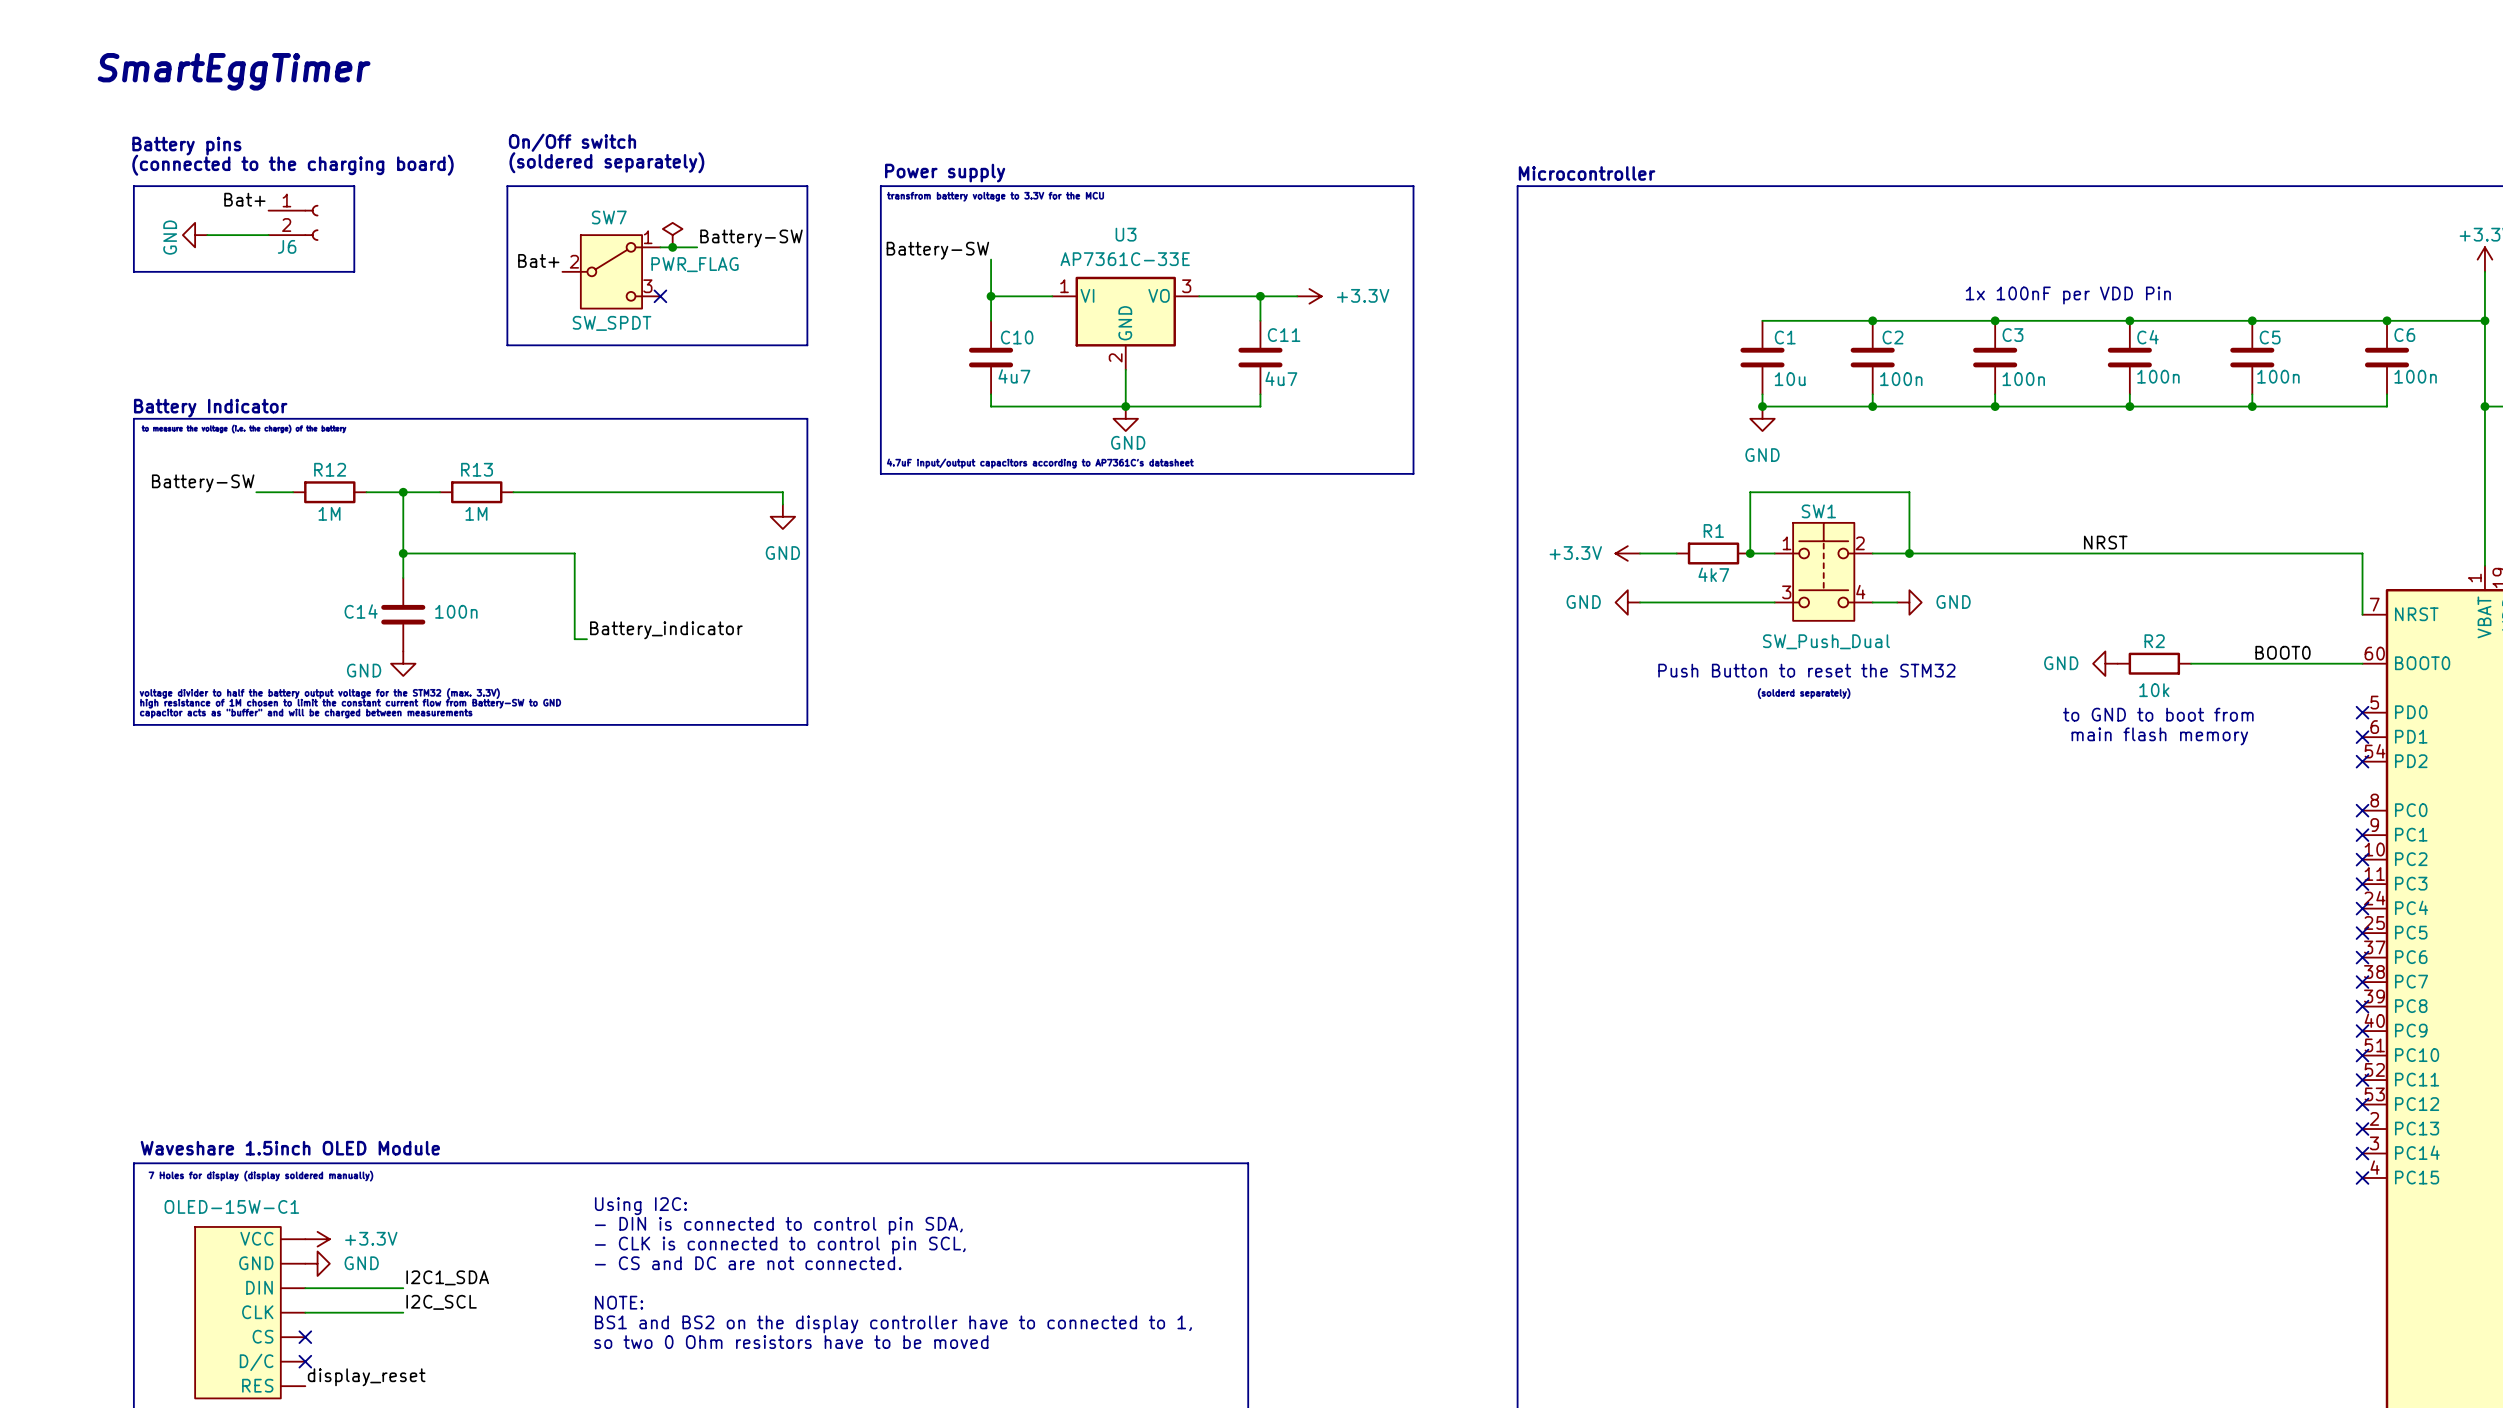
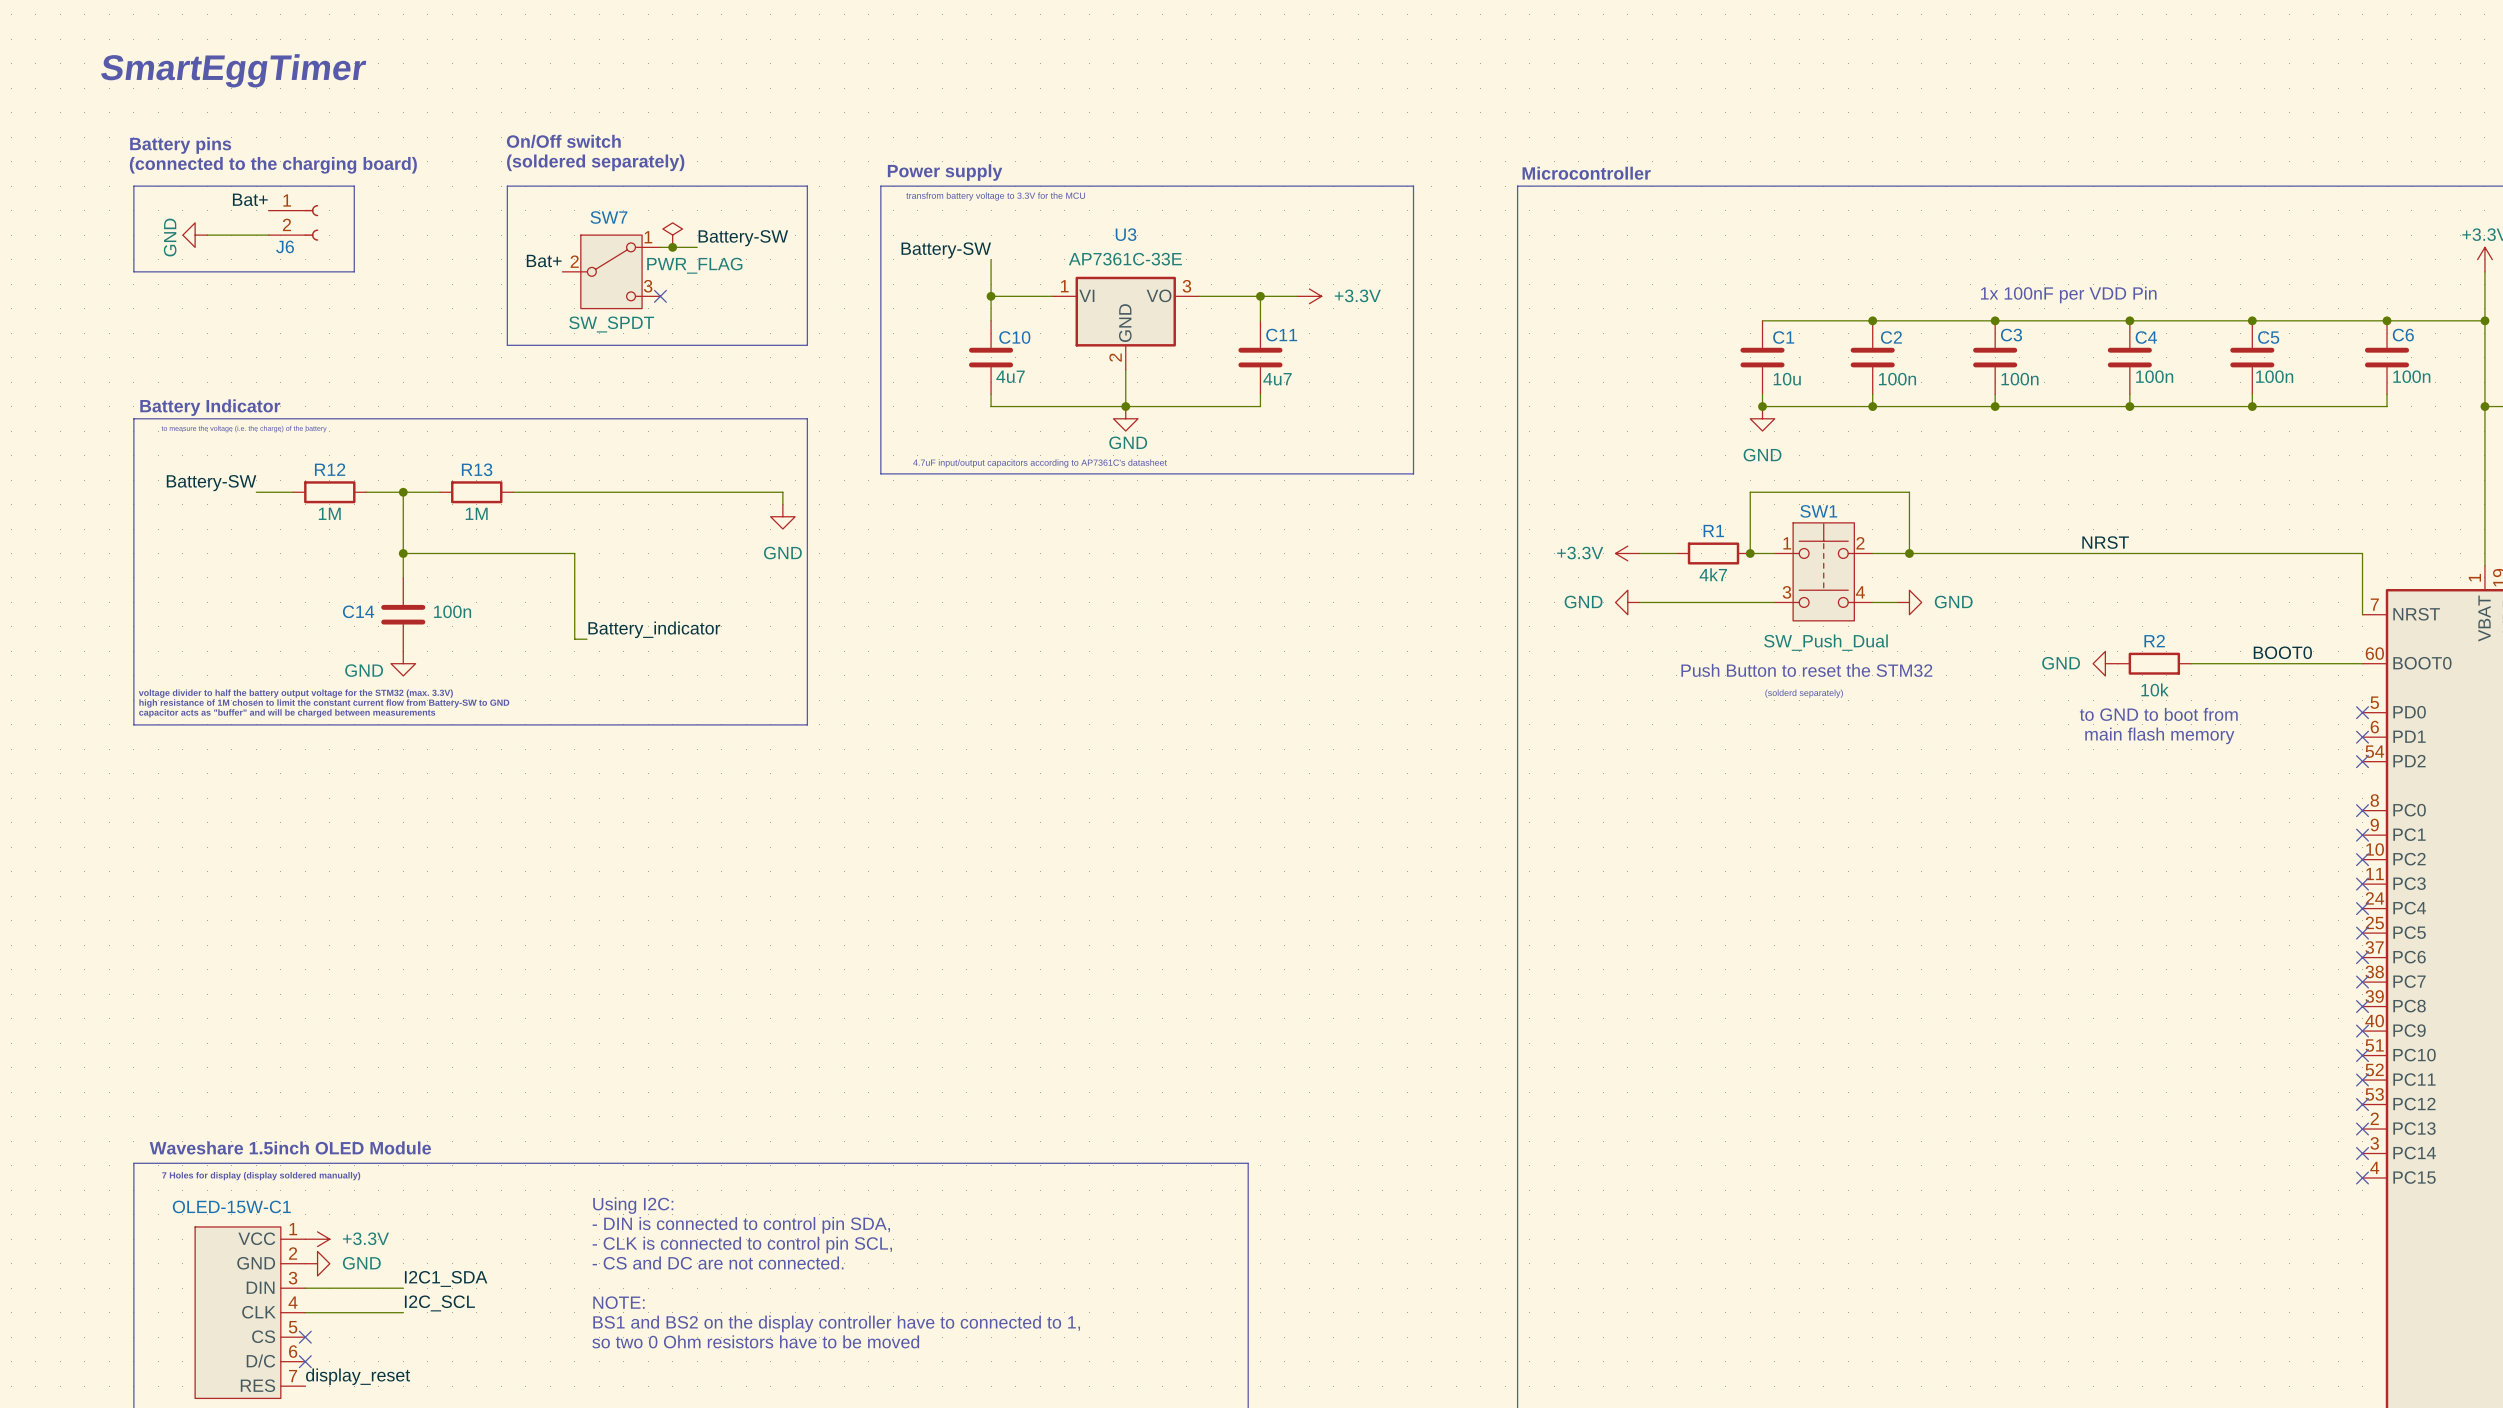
OLED-15W-C1 pin number: none -> 1 (293, 1229)
OLED-15W-C1 pin number: none -> 2 (293, 1253)
OLED-15W-C1 pin number: none -> 3 (293, 1278)
OLED-15W-C1 pin number: none -> 4 (293, 1302)
OLED-15W-C1 pin number: none -> 5 (293, 1327)
OLED-15W-C1 pin number: none -> 6 (293, 1351)
OLED-15W-C1 pin number: none -> 7 (293, 1376)

